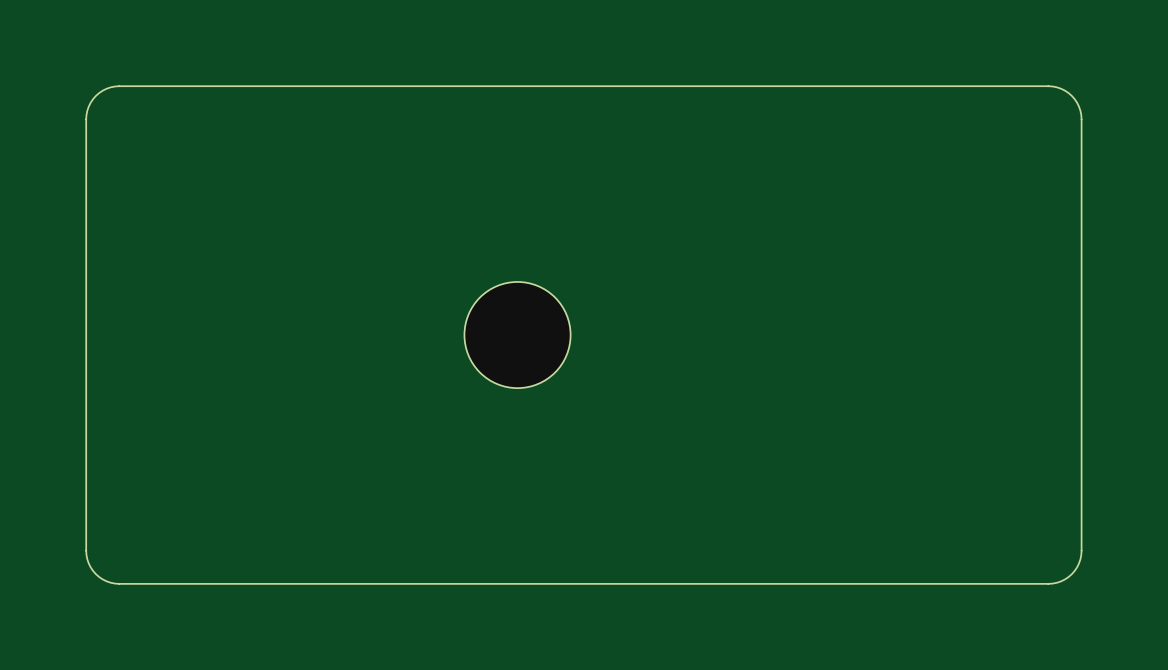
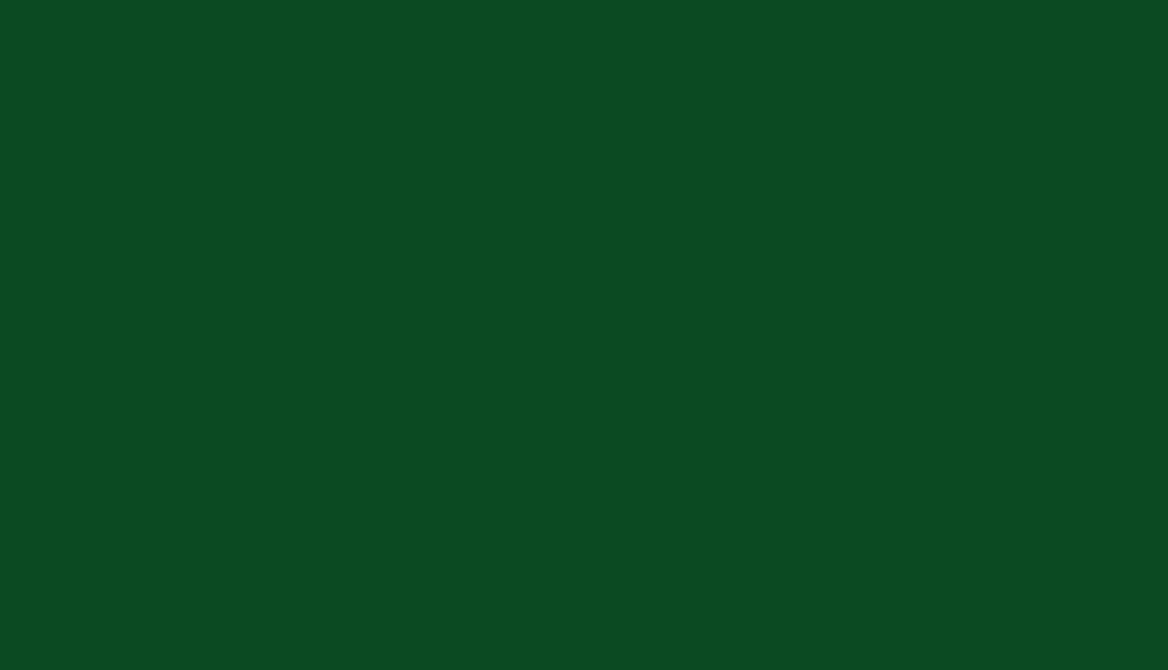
board edge: (1048, 86) (119, 86) (102, 90) (90, 102) (86, 119) (86, 550) (90, 567) (102, 579) (119, 583) (1048, 583) (1064, 579) (1077, 567) (1081, 550) (1081, 119) (1079, 106) (1071, 95) (1061, 88) (1048, 86) -> none
part: (517, 335) -> none

